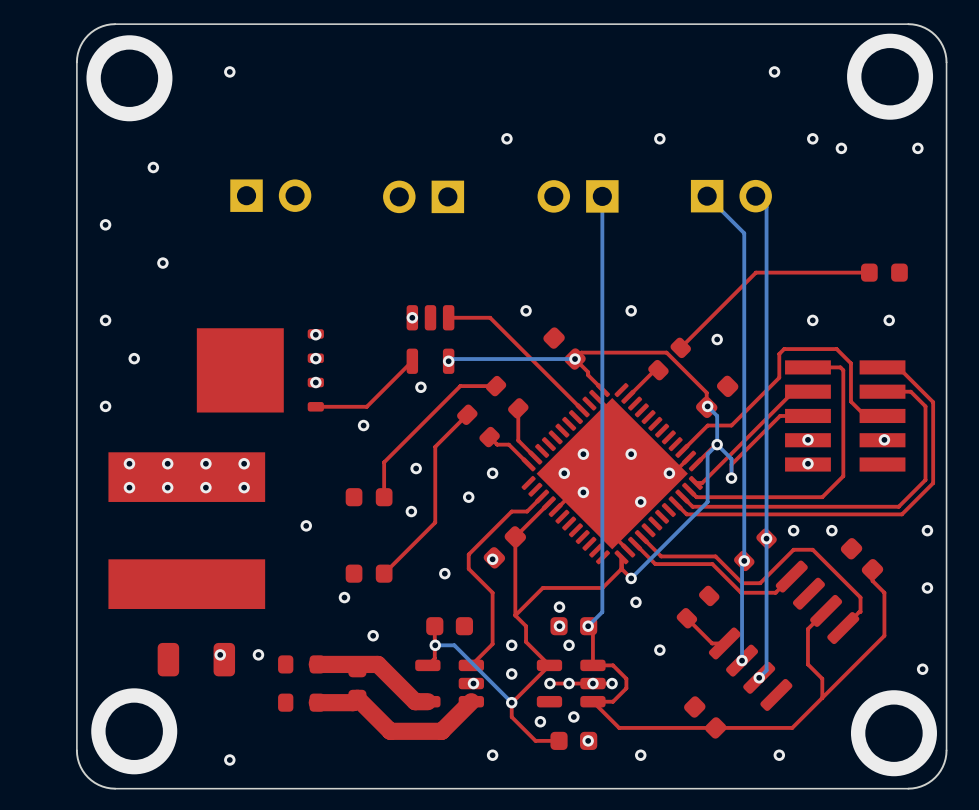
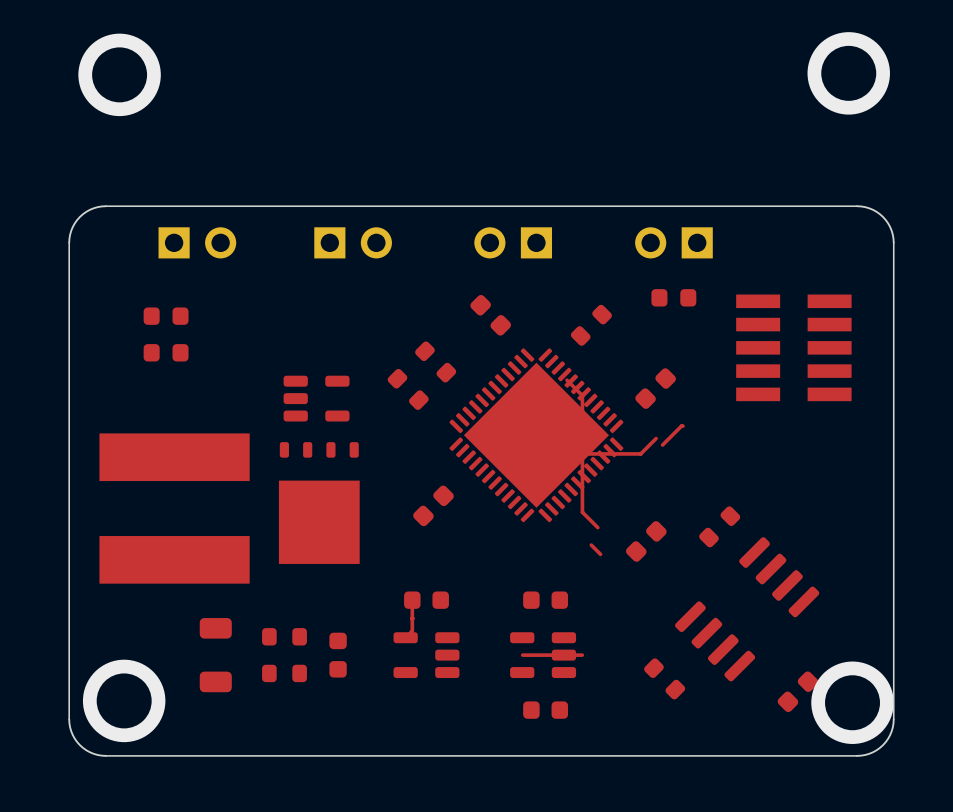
via: (229, 71) -> none
via: (774, 71) -> none
via: (506, 138) -> none
via: (659, 138) -> none
via: (812, 138) -> none
via: (841, 148) -> none
via: (917, 148) -> none
via: (153, 167) -> none
part: (270, 195) -> none
part: (423, 196) -> none
part: (578, 196) -> none
bottom track: (602, 196) (602, 612) (588, 626) -> none
bottom track: (707, 196) (744, 233) (744, 560) (742, 563) (742, 660) -> none
part rotation: 0° (731, 196) -> 180° (673, 242)
part position: (731, 196) -> (673, 242)
bottom track: (755, 196) (766, 207) (766, 670) (759, 677) -> none
via: (105, 224) -> none
board edge: (76, 253) (77, 58) (80, 45) (88, 35) (106, 25) (908, 24) (928, 30) (940, 42) (946, 62) (946, 750) (942, 767) (932, 780) (916, 787) (898, 788) -> (69, 242) (72, 226) (79, 216) (89, 209) (105, 206) (857, 206) (876, 211) (888, 223) (893, 242) (893, 719) (890, 735) (883, 745) (869, 753) (857, 755)
part: none -> (197, 242)
part: none -> (353, 242)
part: none -> (513, 242)
via: (162, 263) -> none
top track: (869, 272) (755, 272) (680, 347) -> none
part position: (884, 272) -> (673, 297)
via: (526, 310) -> none
via: (631, 310) -> none
via: (412, 317) -> none
top track: (448, 317) (490, 317) (582, 410) -> none
via: (105, 320) -> none
via: (812, 320) -> none
via: (889, 320) -> none
part: none -> (166, 316)
via: (315, 334) -> none
part rotation: 0° (430, 339) -> 90° counterclockwise (316, 398)
part position: (430, 339) -> (316, 398)
via: (717, 339) -> none
part position: (564, 348) -> (490, 315)
via: (134, 358) -> none
via: (315, 358) -> none
bottom track: (575, 359) (450, 359) (448, 361) -> none
via: (575, 359) -> none
part position: (669, 359) -> (591, 325)
top track: (412, 361) (366, 406) (315, 406) -> none
via: (448, 361) -> none
top track: (813, 367) (840, 367) (843, 370) (843, 476) (822, 497) (696, 497) (689, 489) -> none
top track: (882, 367) (898, 367) (933, 402) (933, 483) (901, 514) (686, 514) (675, 503) -> none
part: none -> (166, 352)
part rotation: 0° (260, 370) -> 90° counterclockwise (319, 503)
part position: (260, 370) -> (319, 503)
top track: (658, 370) (654, 370) (628, 396) -> none
part: none -> (435, 361)
via: (315, 382) -> none
top track: (495, 386) (460, 386) (384, 462) (384, 497) -> none
via: (420, 387) -> none
top track: (602, 390) (575, 359) (581, 352) (666, 352) (706, 392) (706, 407) -> none
top track: (813, 391) (793, 391) (702, 482) (695, 482) -> none
top track: (888, 391) (910, 391) (925, 406) (925, 479) (898, 506) (692, 506) (682, 496) -> none
part position: (717, 396) -> (655, 388)
part: (507, 397) -> none
via: (105, 406) -> none
part: none -> (408, 389)
bottom track: (707, 406) (717, 415) (717, 444) -> none
via: (707, 406) -> none
top track: (518, 408) (518, 440) (535, 457) -> none
top track: (467, 414) (435, 446) (435, 522) (384, 573) -> none
top track: (807, 415) (780, 415) (731, 464) (731, 478) -> none
part position: (845, 415) -> (793, 347)
top track: (888, 415) (865, 415) (850, 401) (850, 363) (836, 349) (784, 349) (779, 353) (779, 377) (731, 425) (707, 425) (682, 450) -> none
via: (363, 425) -> none
part: (478, 425) -> none
top track: (489, 437) (497, 444) (508, 444) (528, 464) -> none
via: (807, 439) -> none
via: (884, 439) -> none
bottom track: (717, 444) (707, 454) (707, 501) (631, 578) -> none
bottom track: (717, 444) (731, 458) (731, 478) -> none
via: (717, 444) -> none
via: (583, 454) -> none
via: (631, 454) -> none
via: (129, 463) -> none
via: (167, 463) -> none
via: (205, 463) -> none
via: (244, 463) -> none
via: (807, 463) -> none
via: (416, 468) -> none
via: (492, 473) -> none
via: (564, 473) -> none
part position: (612, 473) -> (536, 435)
via: (669, 473) -> none
via: (731, 478) -> none
via: (129, 487) -> none
via: (167, 487) -> none
via: (205, 487) -> none
via: (244, 487) -> none
via: (583, 492) -> none
top track: (542, 496) (527, 511) (511, 511) (468, 554) (468, 568) (492, 592) (492, 644) (471, 665) -> none
part: (369, 497) -> none
via: (468, 497) -> none
via: (640, 501) -> none
top track: (548, 503) (515, 536) (515, 615) -> none
via: (411, 511) -> none
via: (306, 525) -> none
via: (793, 530) -> none
via: (831, 530) -> none
via: (927, 530) -> none
top track: (641, 537) (661, 556) (715, 556) (742, 583) (760, 583) (793, 549) (812, 549) (860, 597) (860, 611) (843, 628) -> none
via: (766, 538) -> none
top track: (635, 543) (655, 564) (712, 564) (741, 592) (775, 592) (791, 576) -> none
part position: (504, 547) -> (433, 505)
top track: (621, 557) (621, 568) (602, 587) (542, 587) (515, 615) -> none
via: (492, 559) -> none
part: (862, 559) -> none
via: (744, 560) -> none
part: none -> (646, 541)
top track: (872, 569) (872, 580) (884, 592) (884, 635) (792, 727) (619, 727) (592, 701) (613, 701) (626, 688) (626, 678) (613, 665) (592, 665) (592, 630) (588, 626) -> none
part: (369, 573) -> none
via: (444, 573) -> none
via: (631, 578) -> none
via: (927, 587) -> none
via: (344, 597) -> none
via: (635, 602) -> none
via: (559, 607) -> none
part: (698, 607) -> none
top track: (826, 610) (807, 629) (807, 664) (822, 678) (822, 697) -> none
top track: (515, 615) (526, 626) (526, 641) (549, 665) (511, 702) (511, 716) (535, 740) (559, 740) -> none
top track: (686, 618) (712, 643) (724, 643) -> none
via: (559, 626) -> none
via: (588, 626) -> none
via: (373, 635) -> none
bottom track: (435, 645) (454, 645) (511, 702) -> none
via: (435, 645) -> none
via: (511, 645) -> none
via: (569, 645) -> none
via: (659, 650) -> none
via: (220, 654) -> none
via: (258, 654) -> none
part rotation: 0° (196, 659) -> 90° clockwise (215, 655)
via: (742, 660) -> none
top track: (317, 664) (377, 664) (415, 701) (427, 701) -> none
via: (922, 669) -> none
via: (511, 673) -> none
via: (759, 677) -> none
via: (473, 683) -> none
via: (549, 683) -> none
via: (569, 683) -> none
via: (592, 683) -> none
via: (612, 683) -> none
part footprint: [684, 696, 727, 739] -> [644, 658, 686, 700]
top track: (471, 701) (441, 731) (390, 731) (357, 698) (353, 702) (317, 702) -> none
via: (511, 702) -> none
via: (573, 716) -> none
via: (540, 721) -> none
part: none -> (798, 691)
via: (588, 740) -> none
via: (492, 755) -> none
via: (640, 755) -> none
via: (779, 755) -> none
via: (229, 760) -> none

